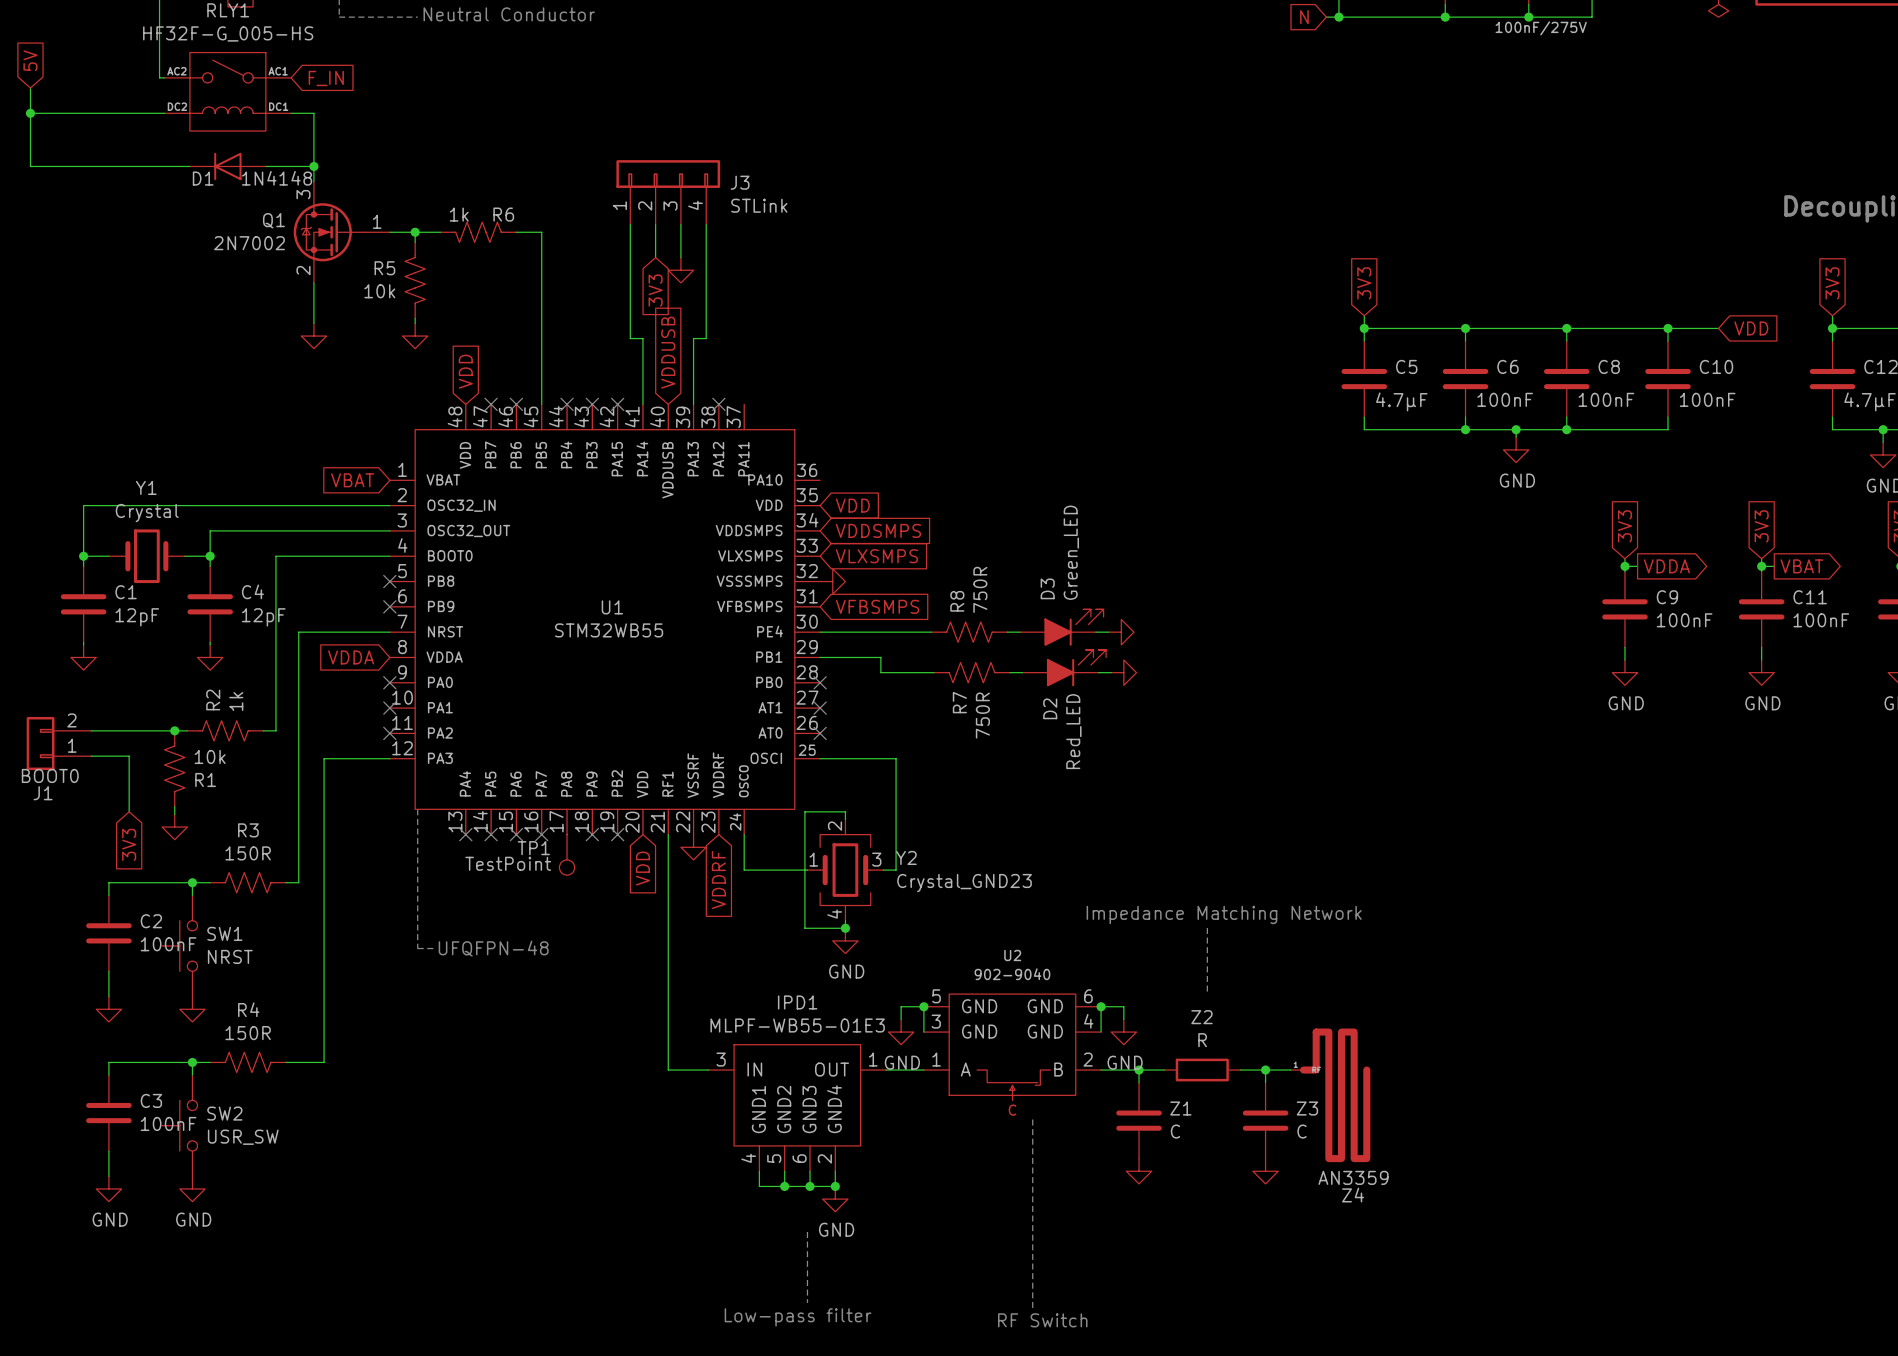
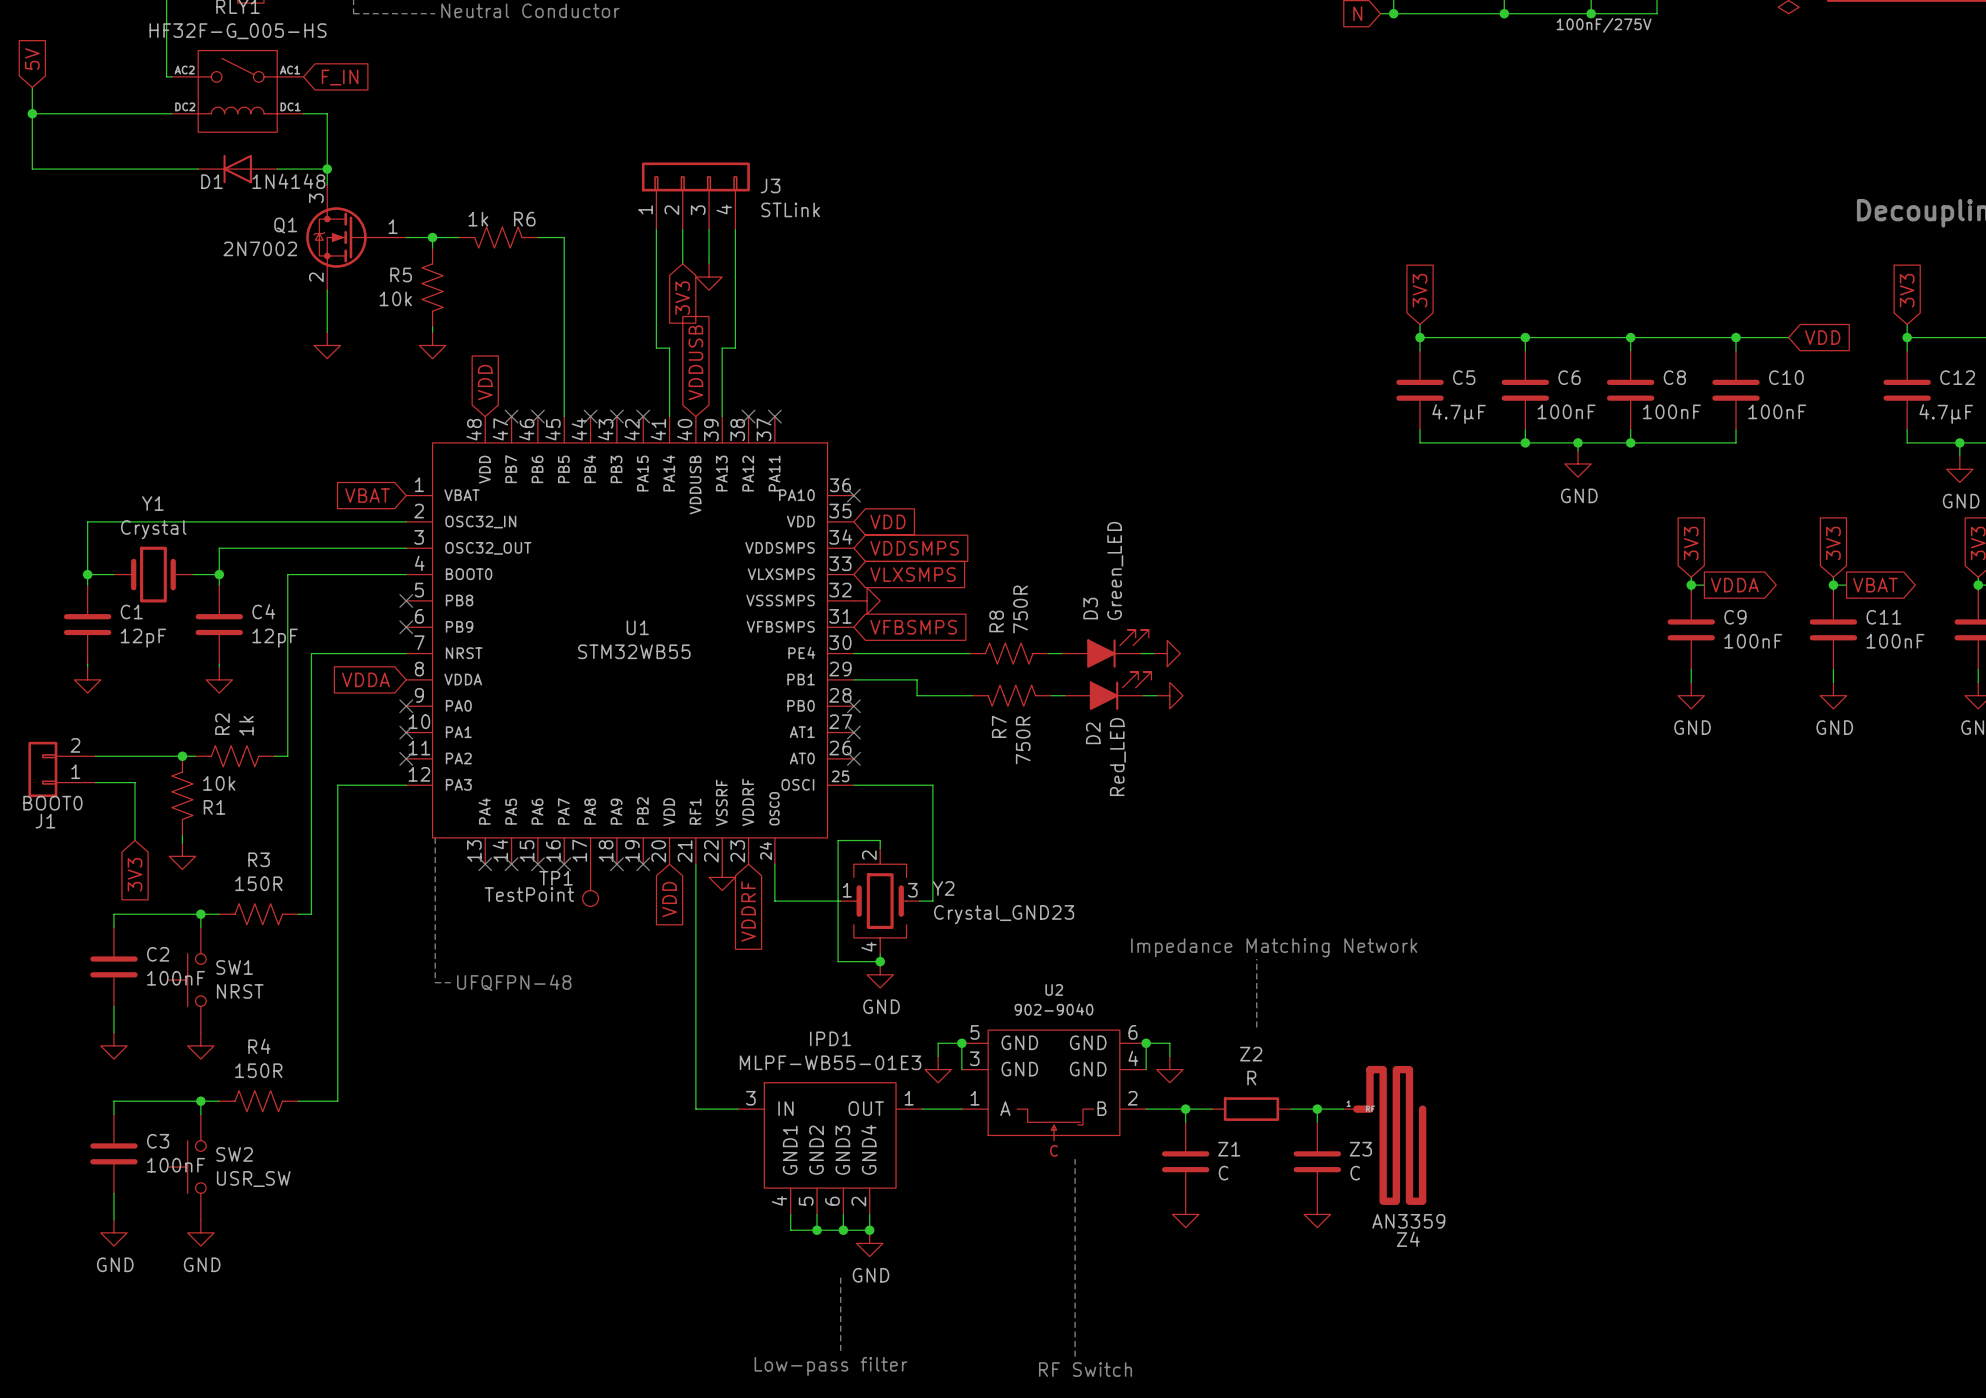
no-connect mark: none -> (774, 416)
no-connect mark: none -> (853, 495)
power symbol text: GND (902, 1062) -> none
power symbol text: GND (1125, 1062) -> none

